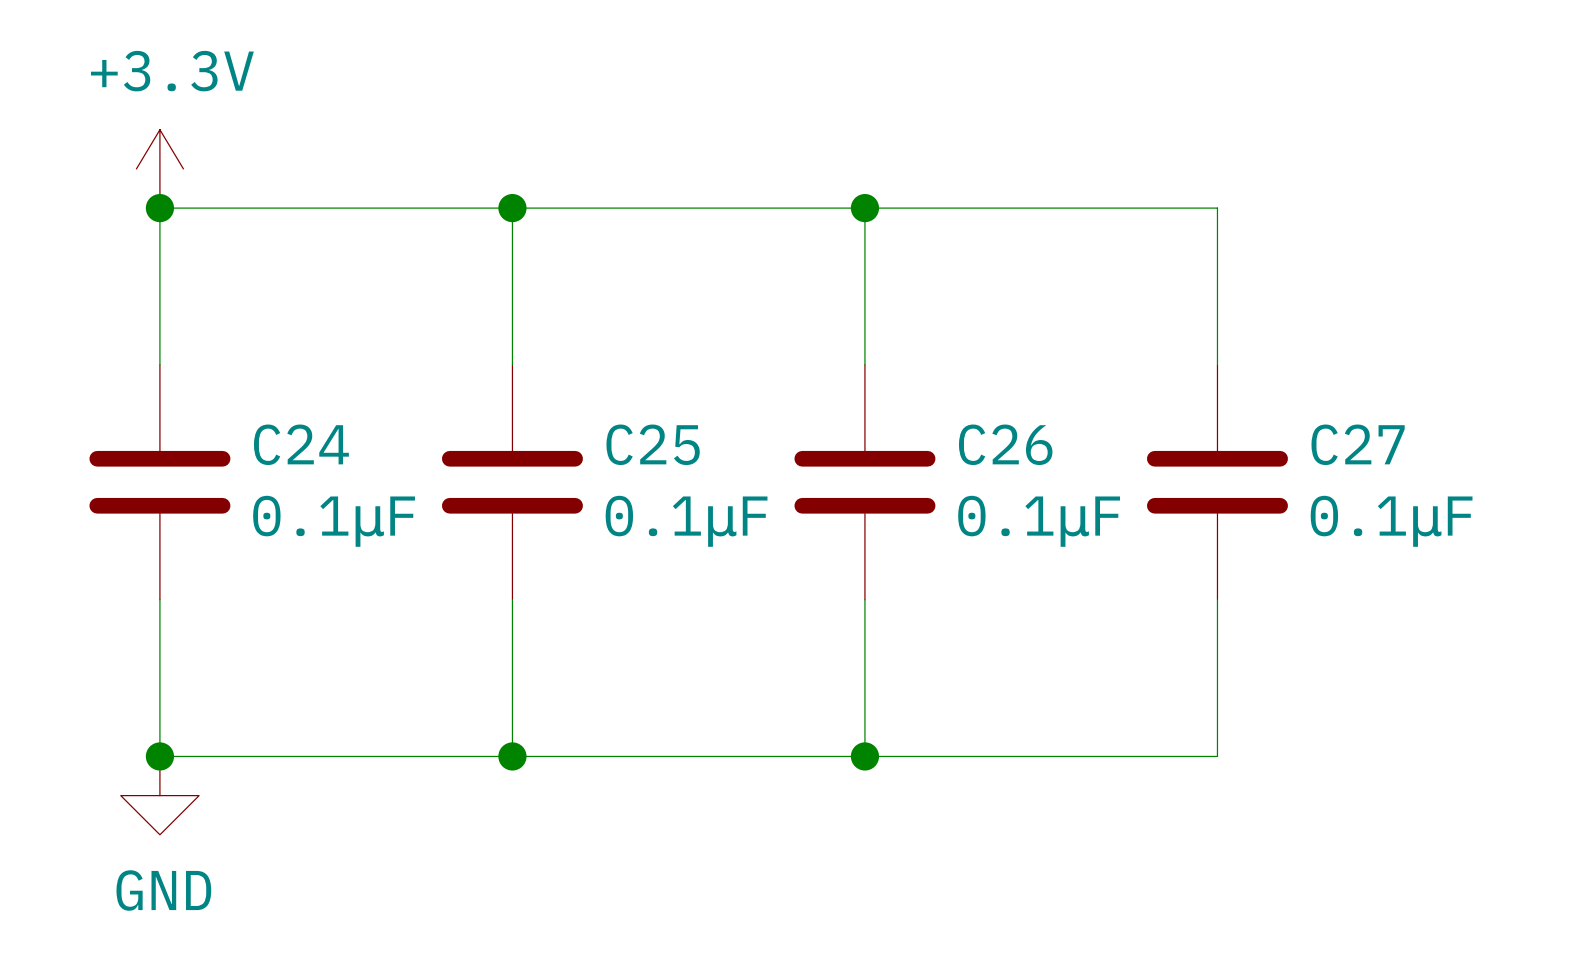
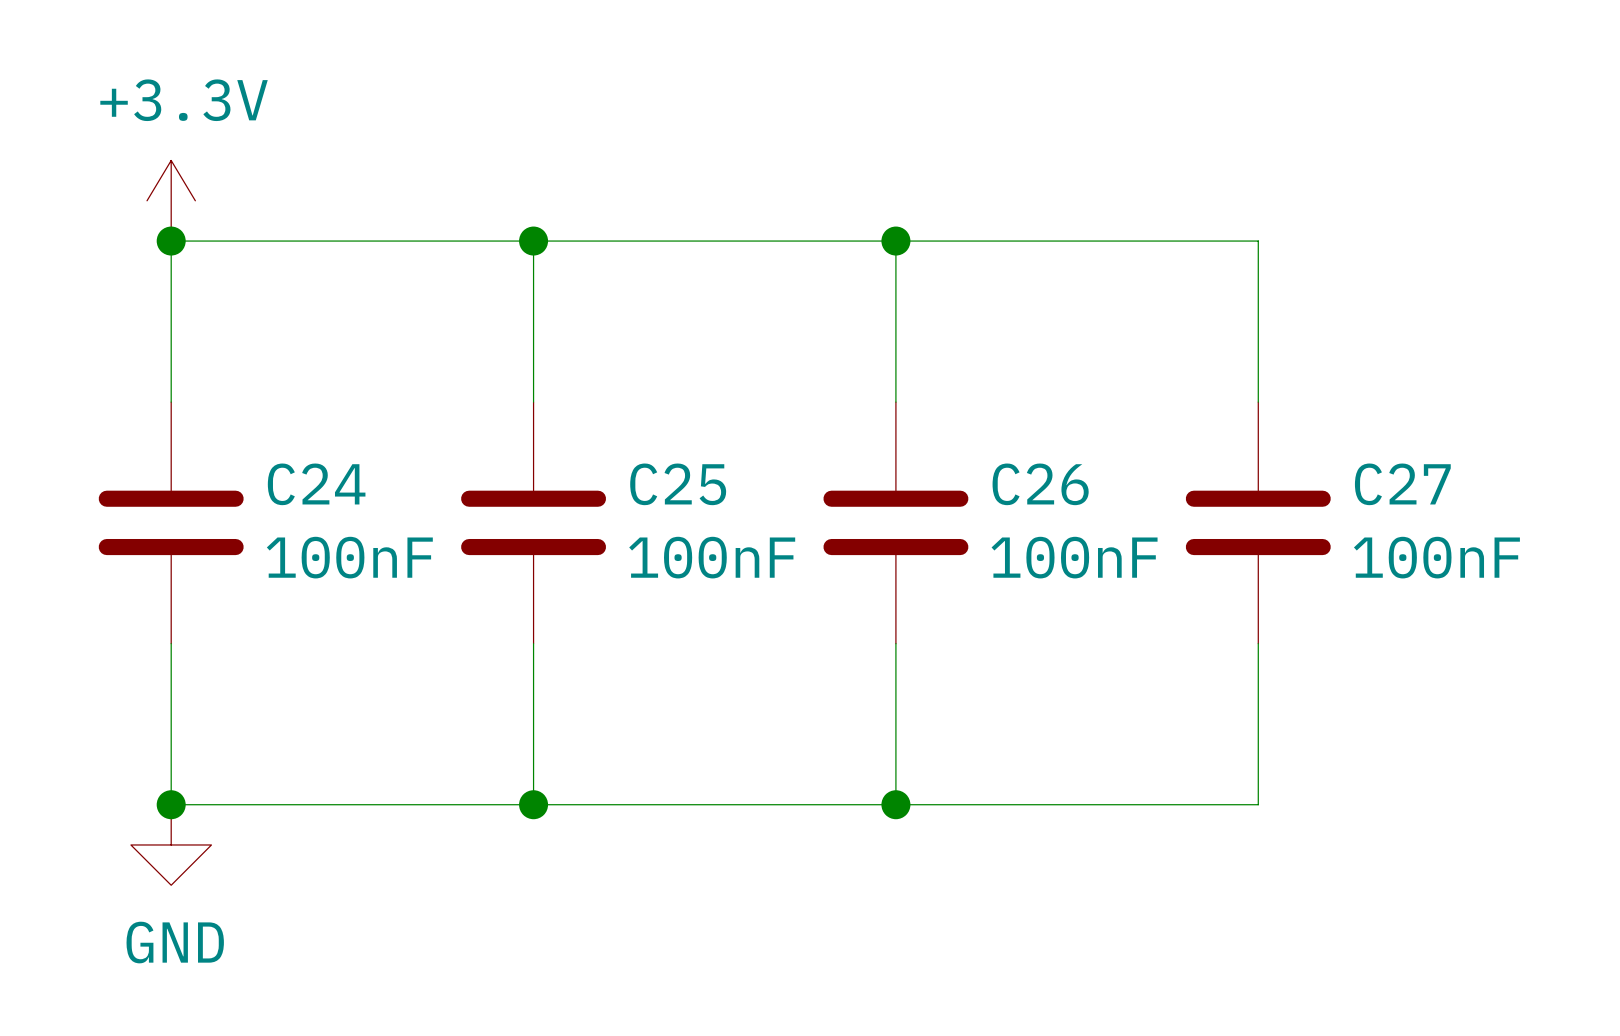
C24 value: 0.1μF (334, 521) -> 100nF (349, 557)
C25 value: 0.1μF (686, 521) -> 100nF (712, 557)
C26 value: 0.1μF (1039, 521) -> 100nF (1074, 557)
C27 value: 0.1μF (1391, 521) -> 100nF (1436, 557)

